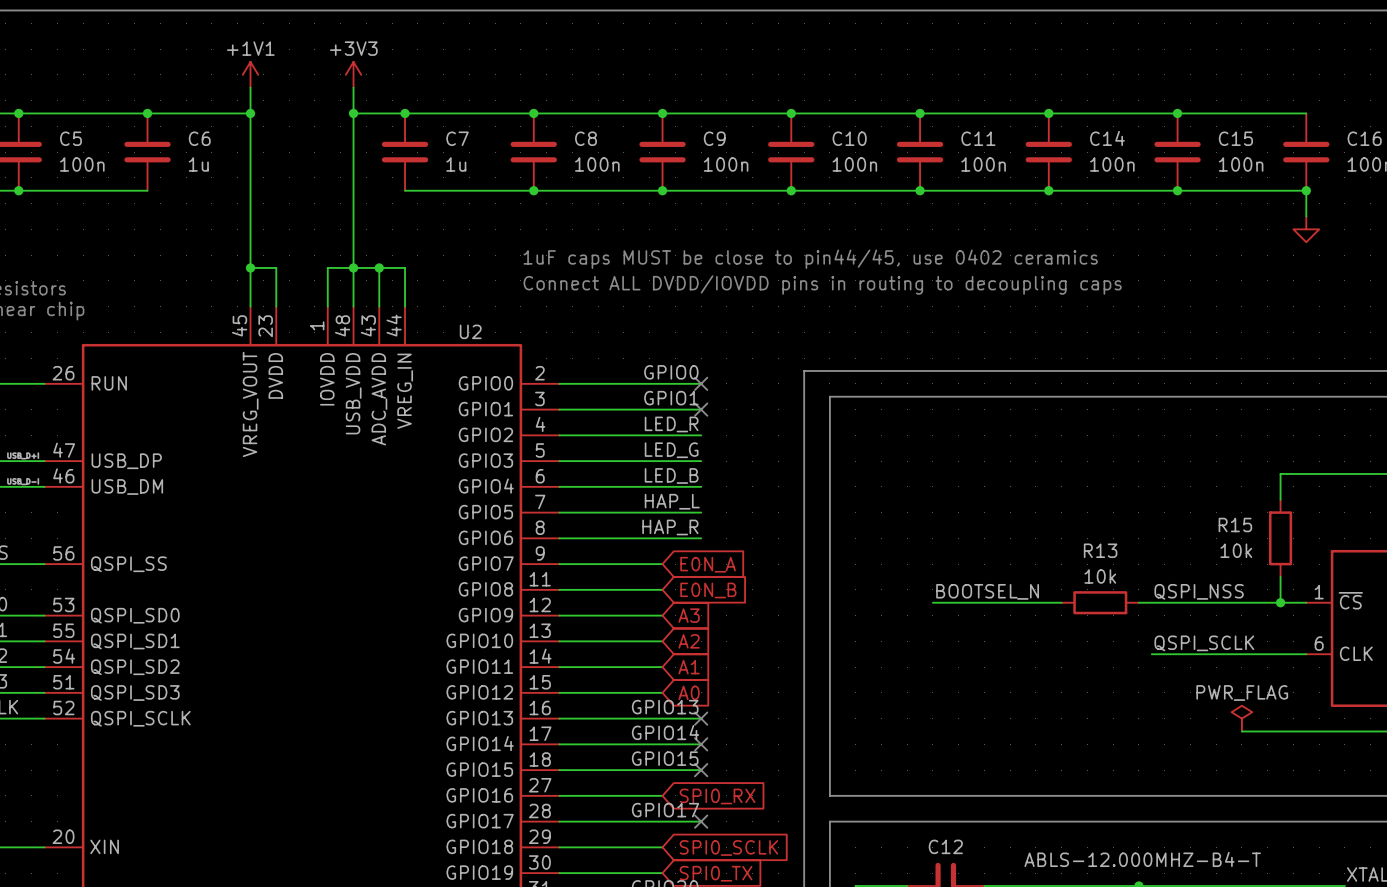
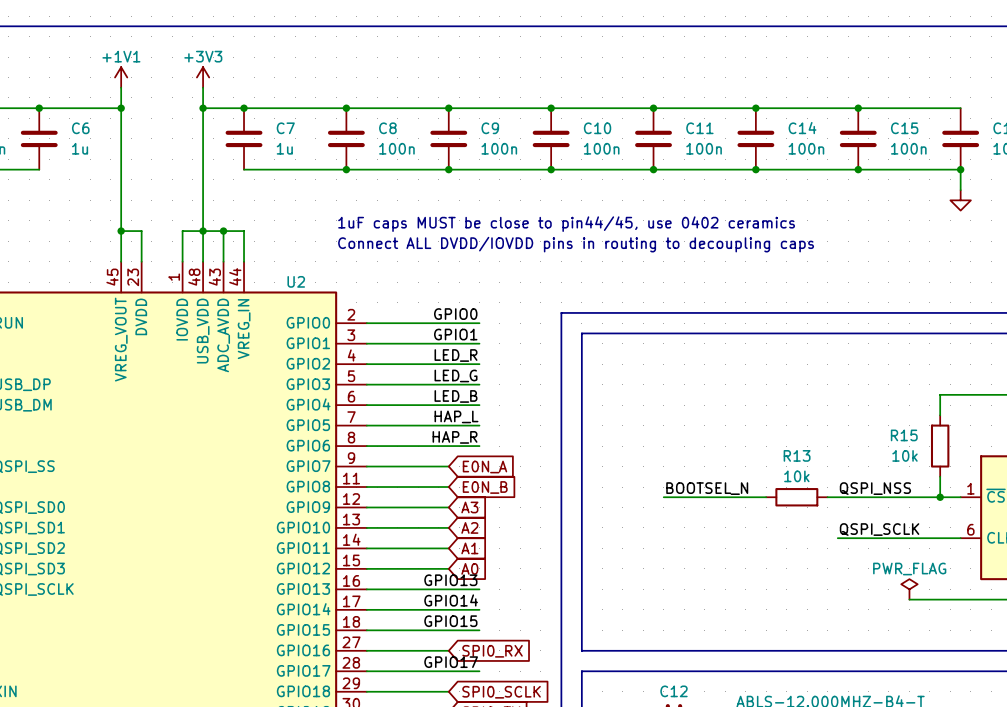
no-connect mark: (701, 383) -> none
no-connect mark: (701, 409) -> none
no-connect mark: (701, 718) -> none
no-connect mark: (701, 744) -> none
no-connect mark: (701, 770) -> none
no-connect mark: (701, 821) -> none

